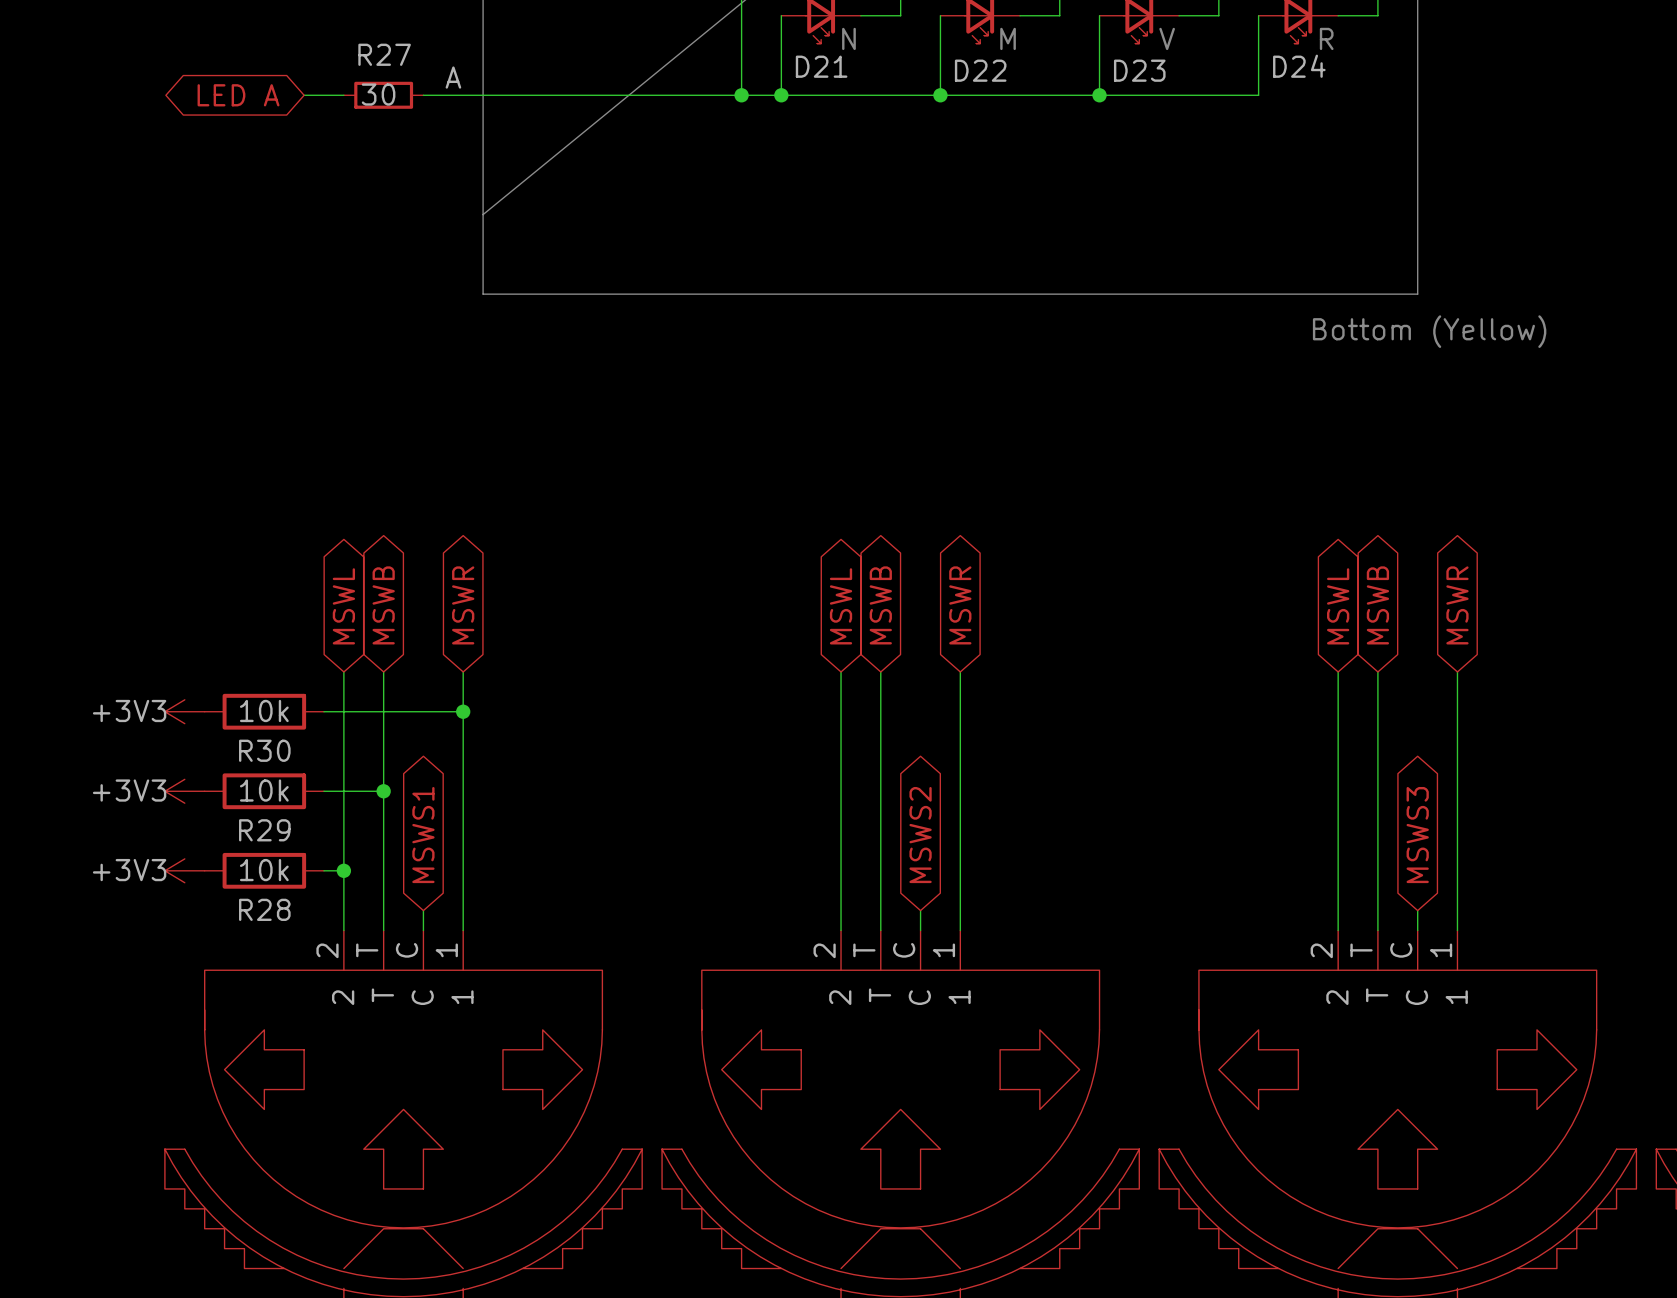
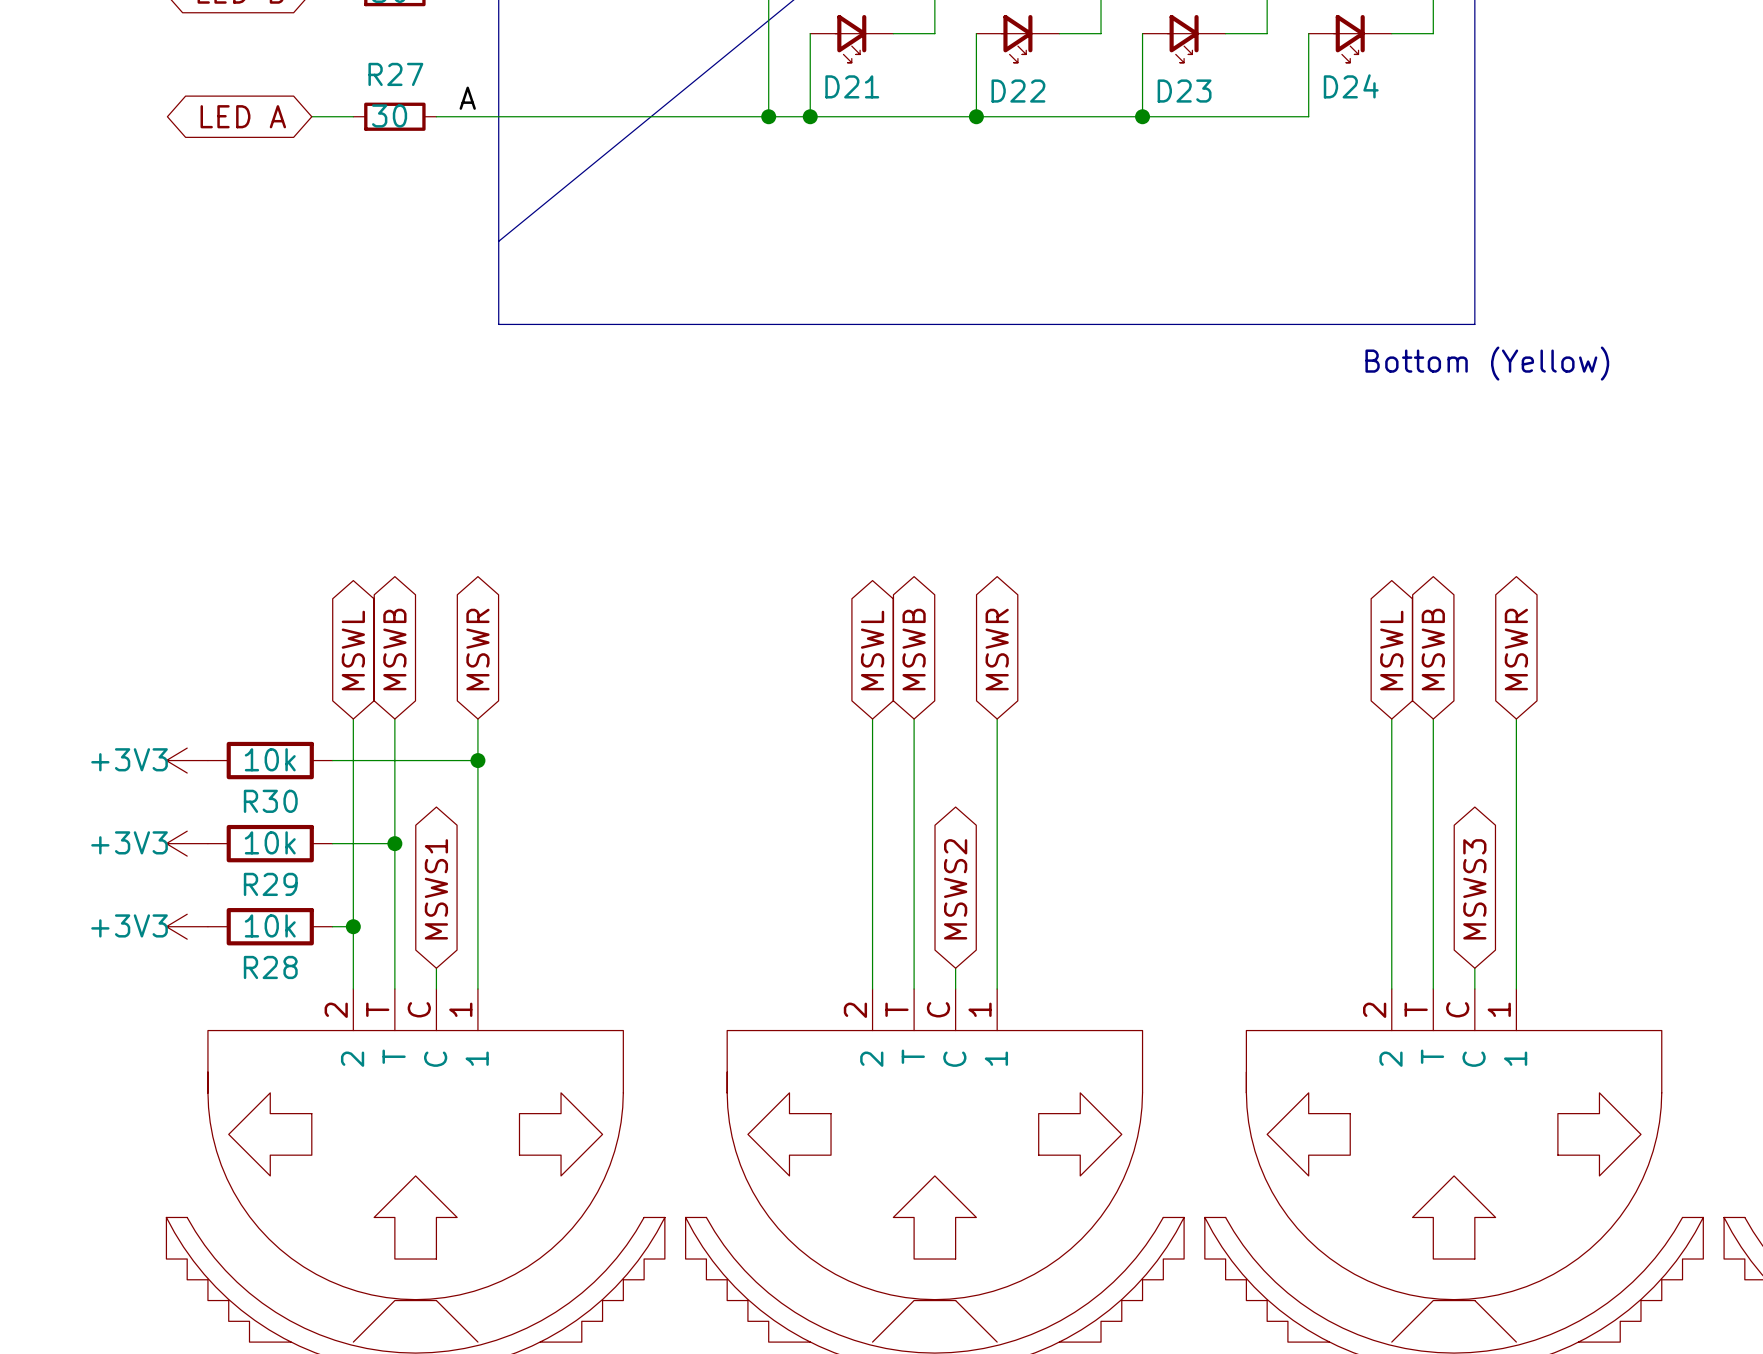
text: N (848, 38) -> none
text: M (1008, 38) -> none
text: V (1167, 38) -> none
text: R (1326, 38) -> none

